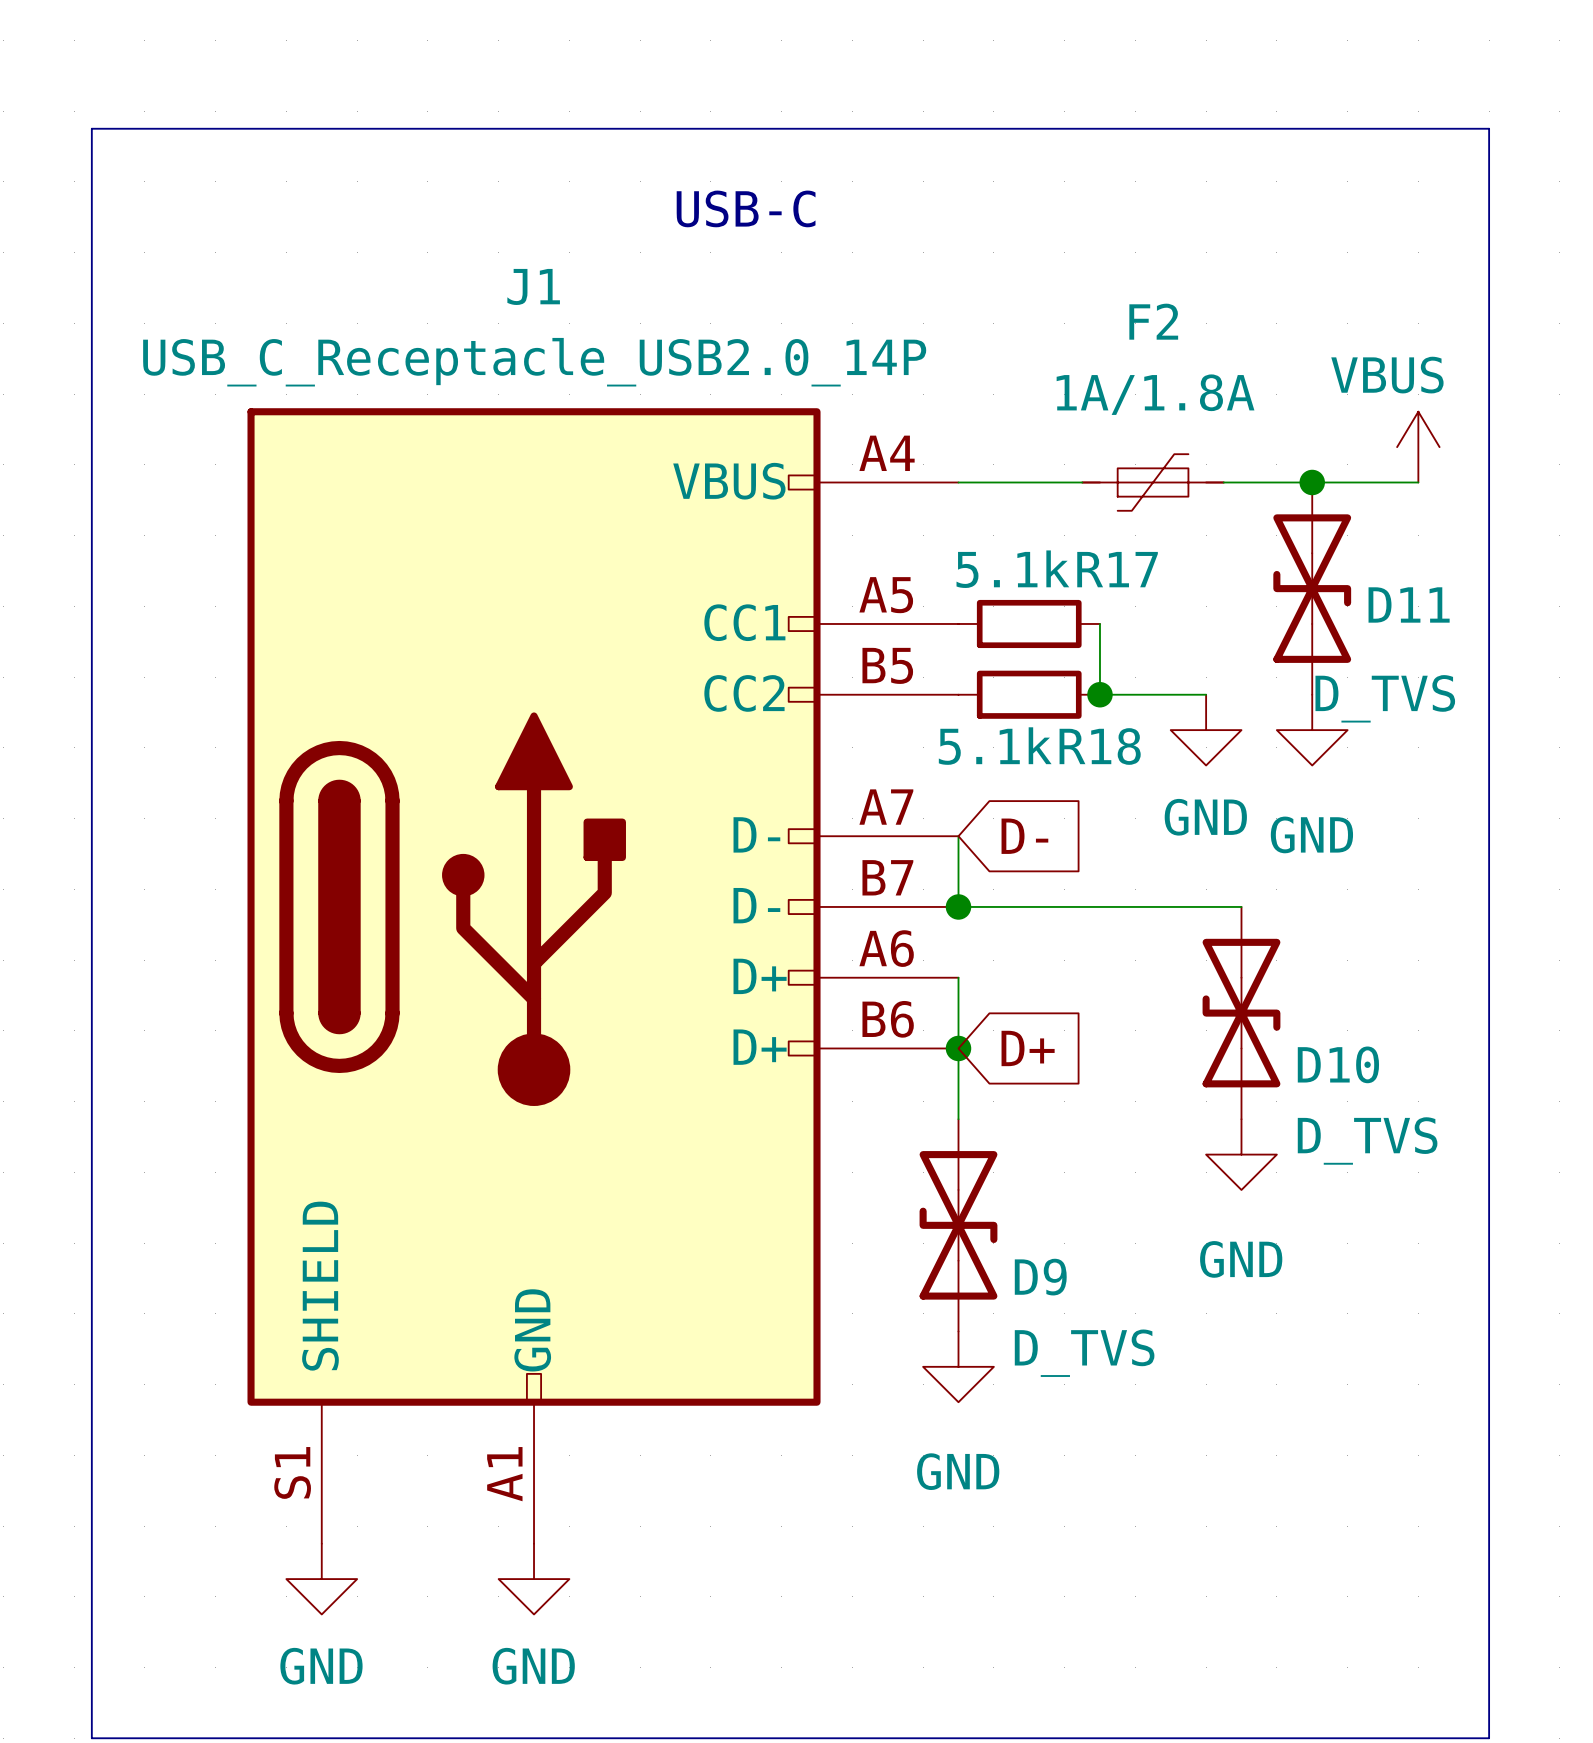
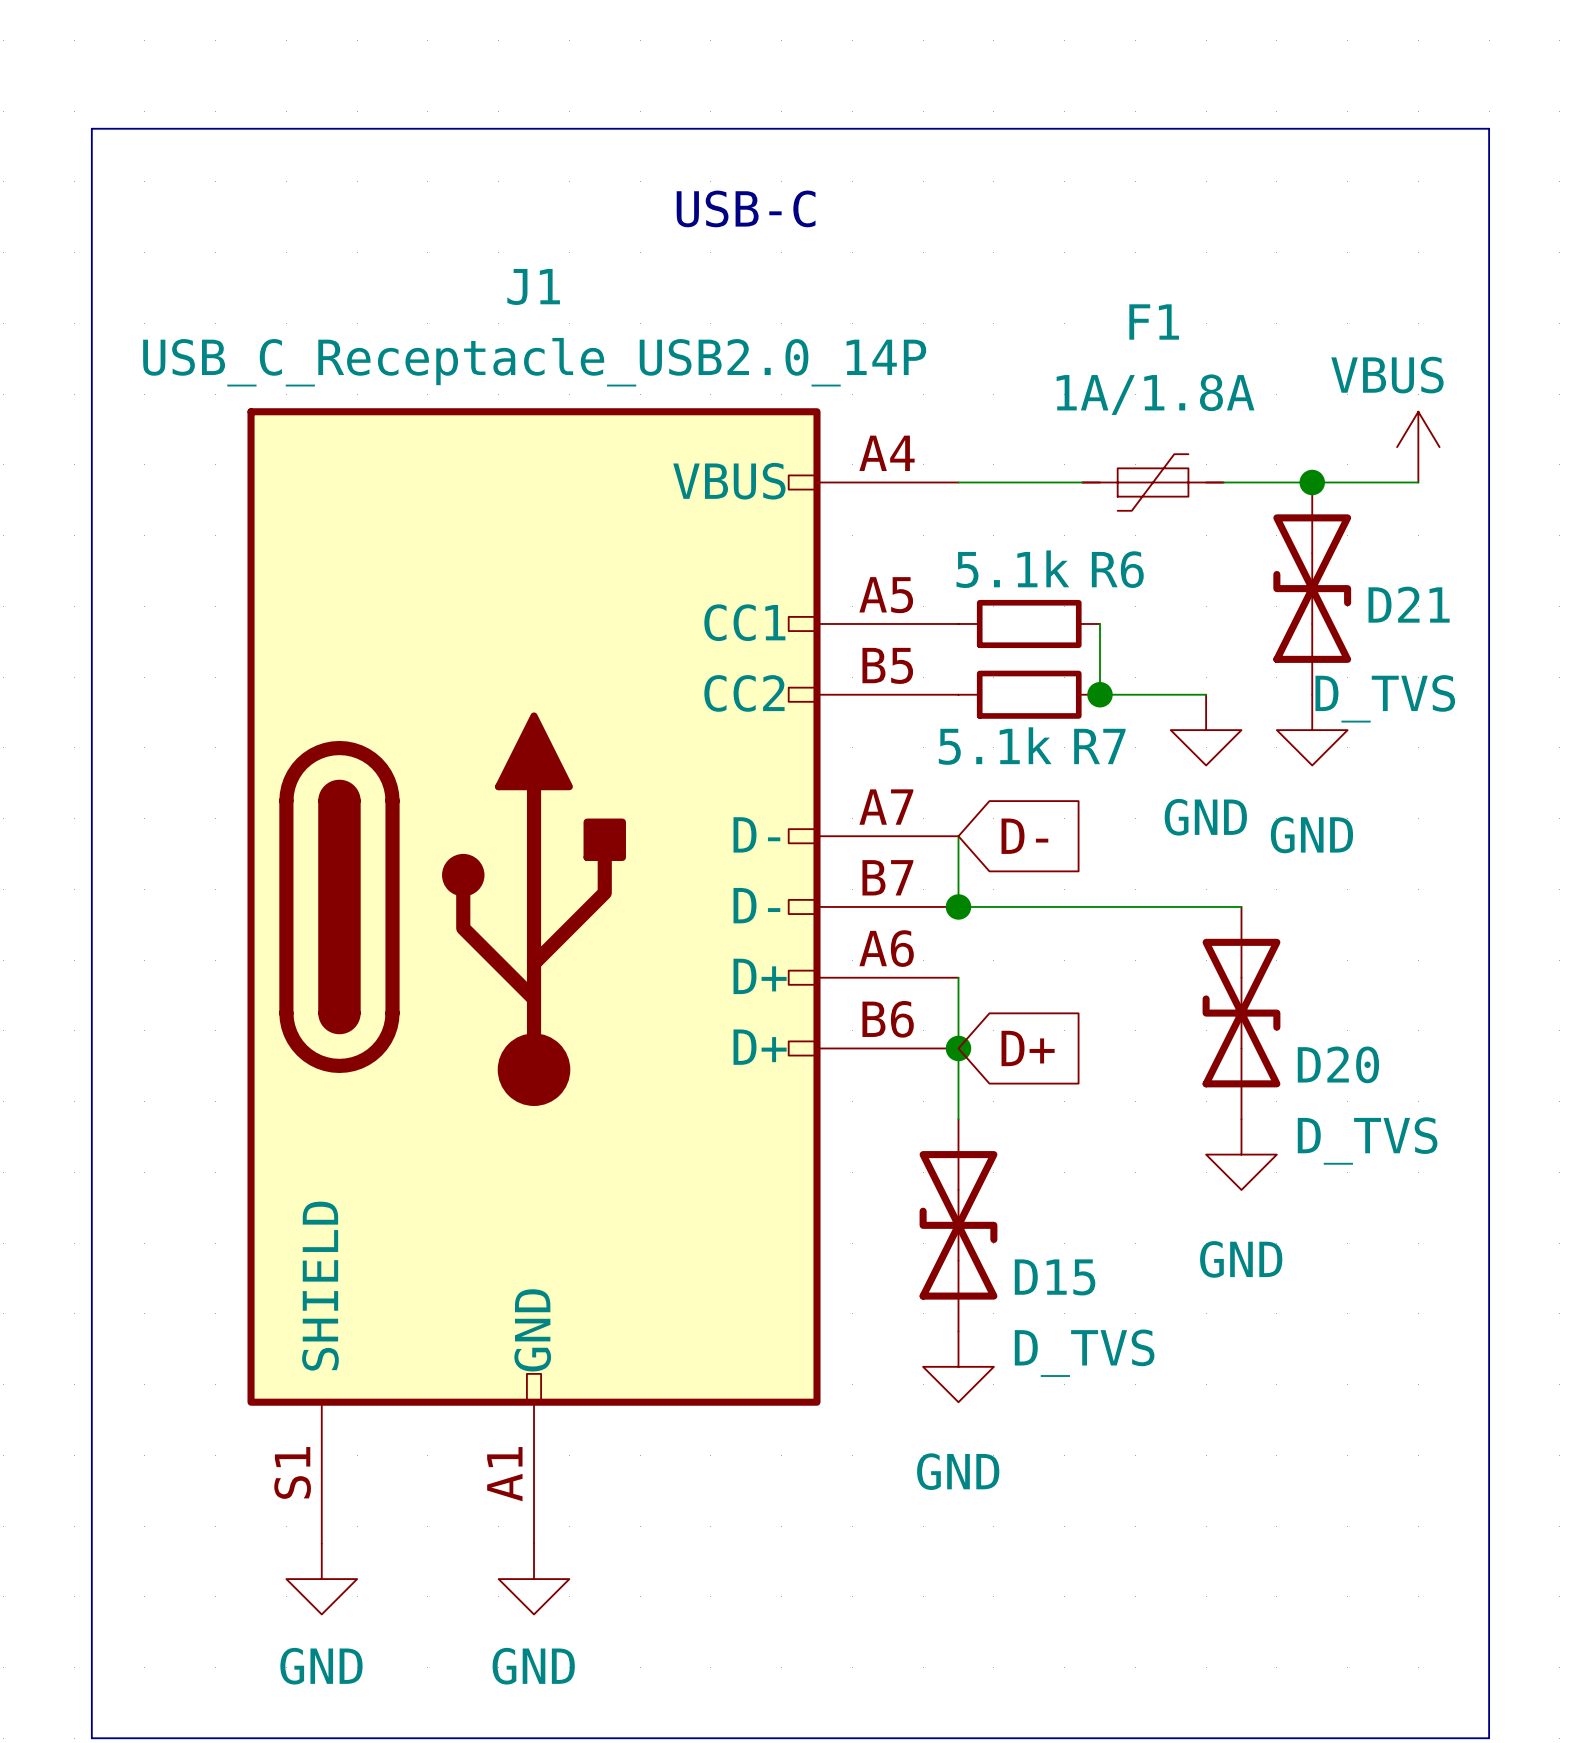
F2 name: F2 (1153, 321) -> F1 (1154, 321)
R17 name: R17 (1117, 569) -> R6 (1117, 569)
D11 name: D11 (1409, 604) -> D21 (1409, 604)
R18 name: R18 (1100, 746) -> R7 (1099, 746)
D10 name: D10 (1338, 1064) -> D20 (1338, 1064)
D9 name: D9 (1040, 1277) -> D15 (1055, 1277)

